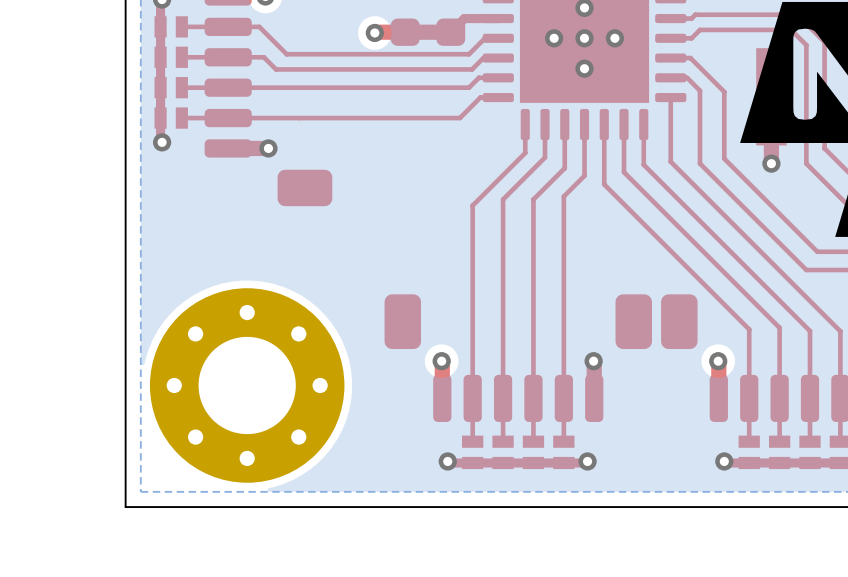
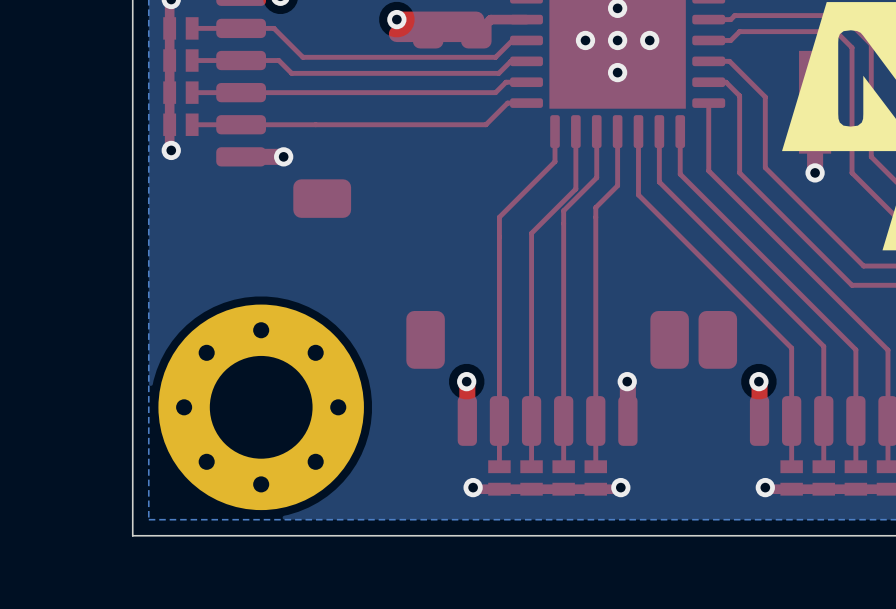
top track: none -> (476, 19) (396, 19)
via position: (374, 32) -> (396, 19)
top track: (545, 157) (503, 199) (503, 220) -> (575, 166) (575, 188) (531, 233)

